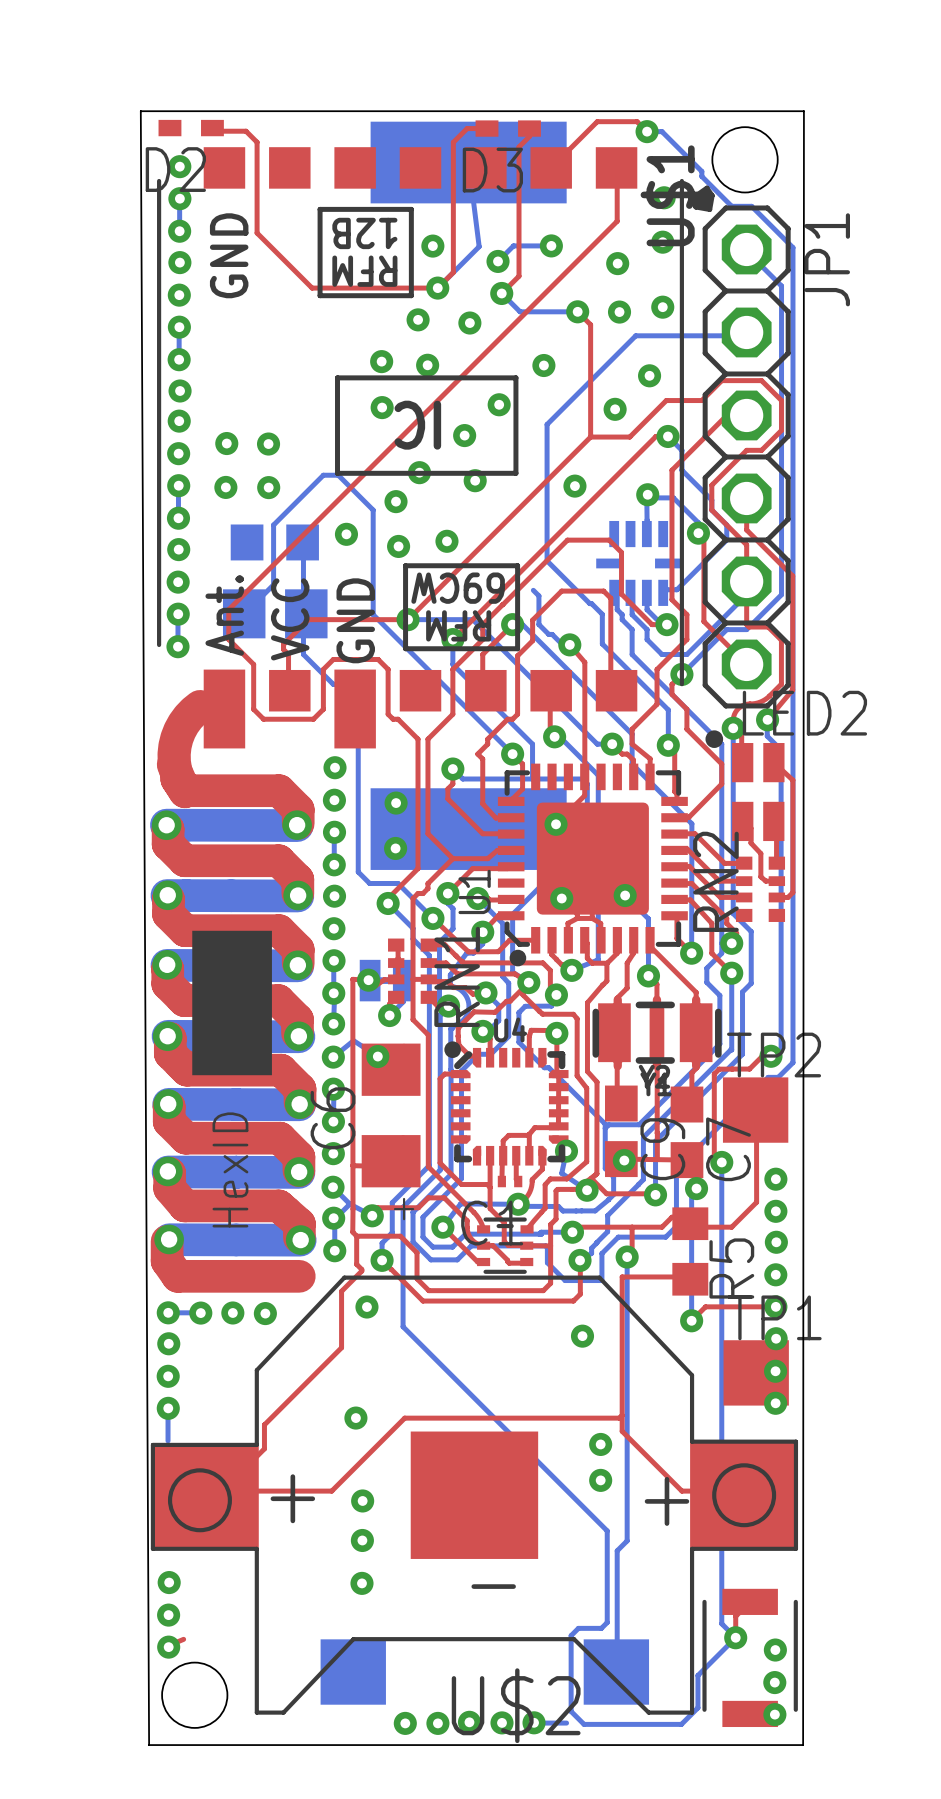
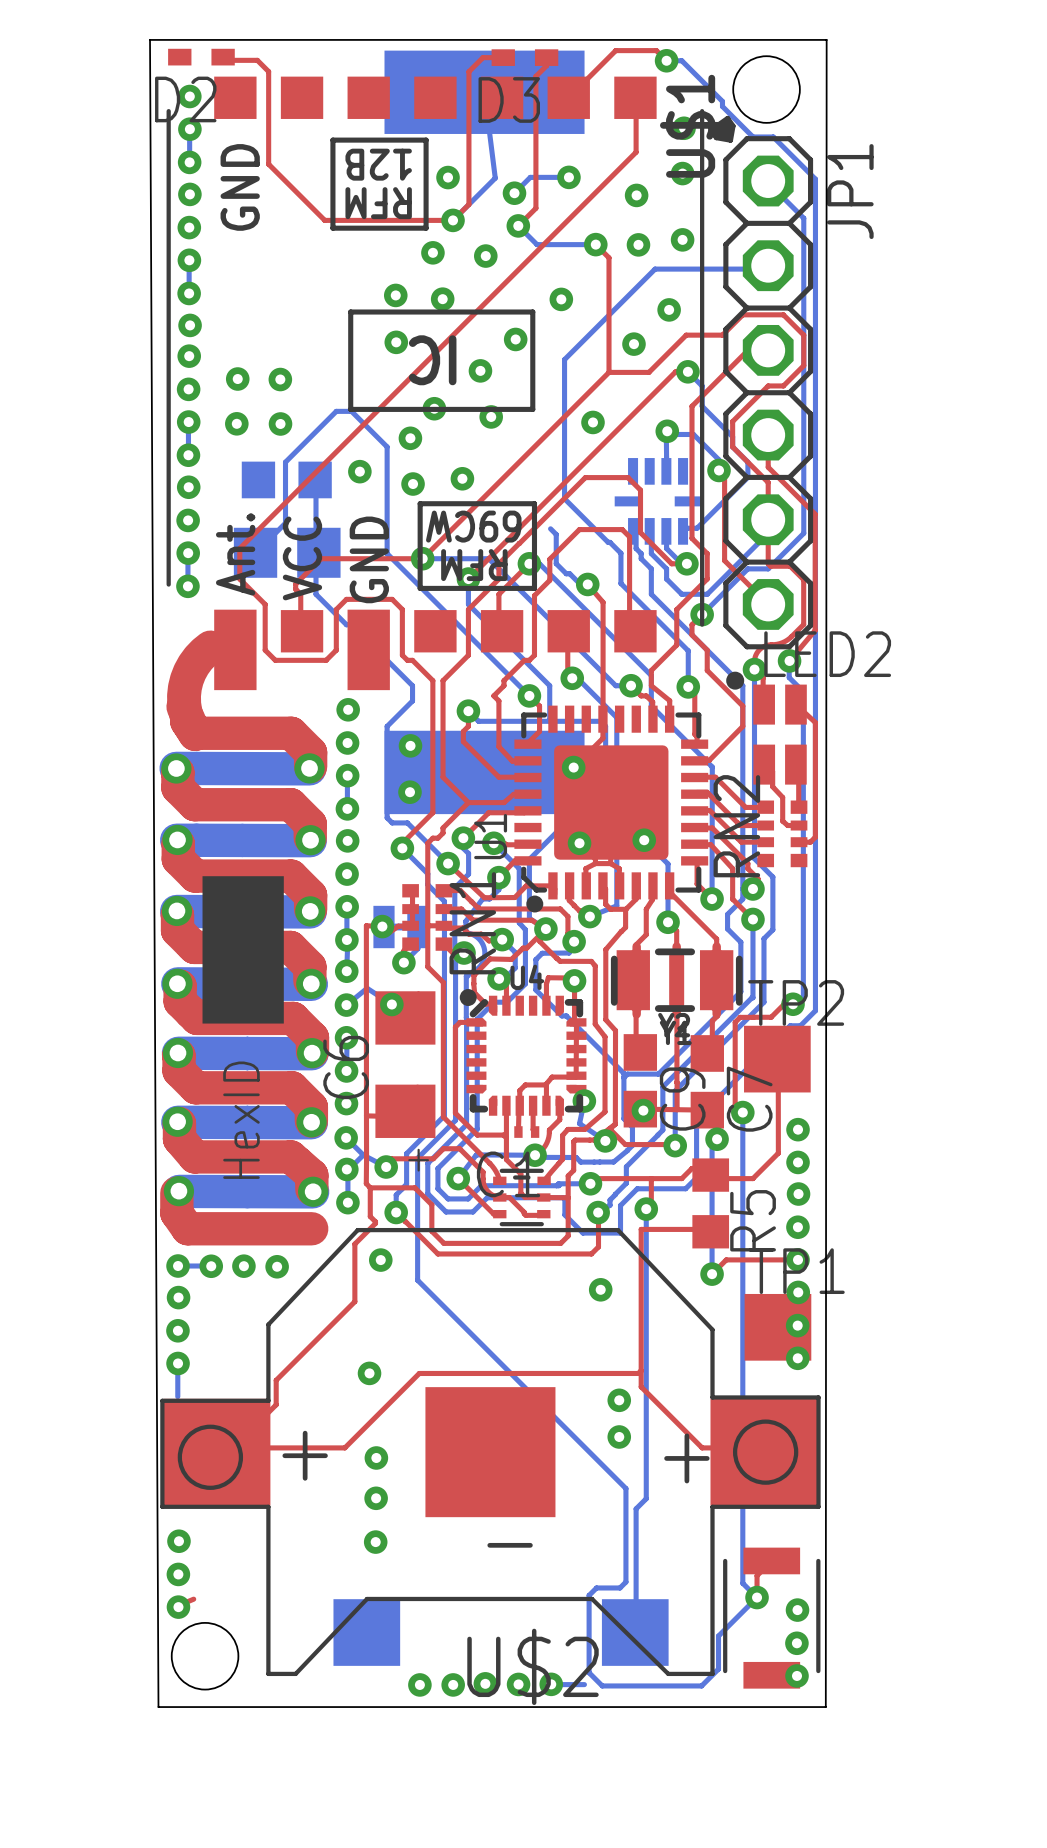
bottom track: (358, 704) (358, 872) (369, 883) (398, 883) -> (371, 645) (412, 685) (412, 700) (387, 726) (387, 817) (392, 822) (407, 822) (412, 827)

